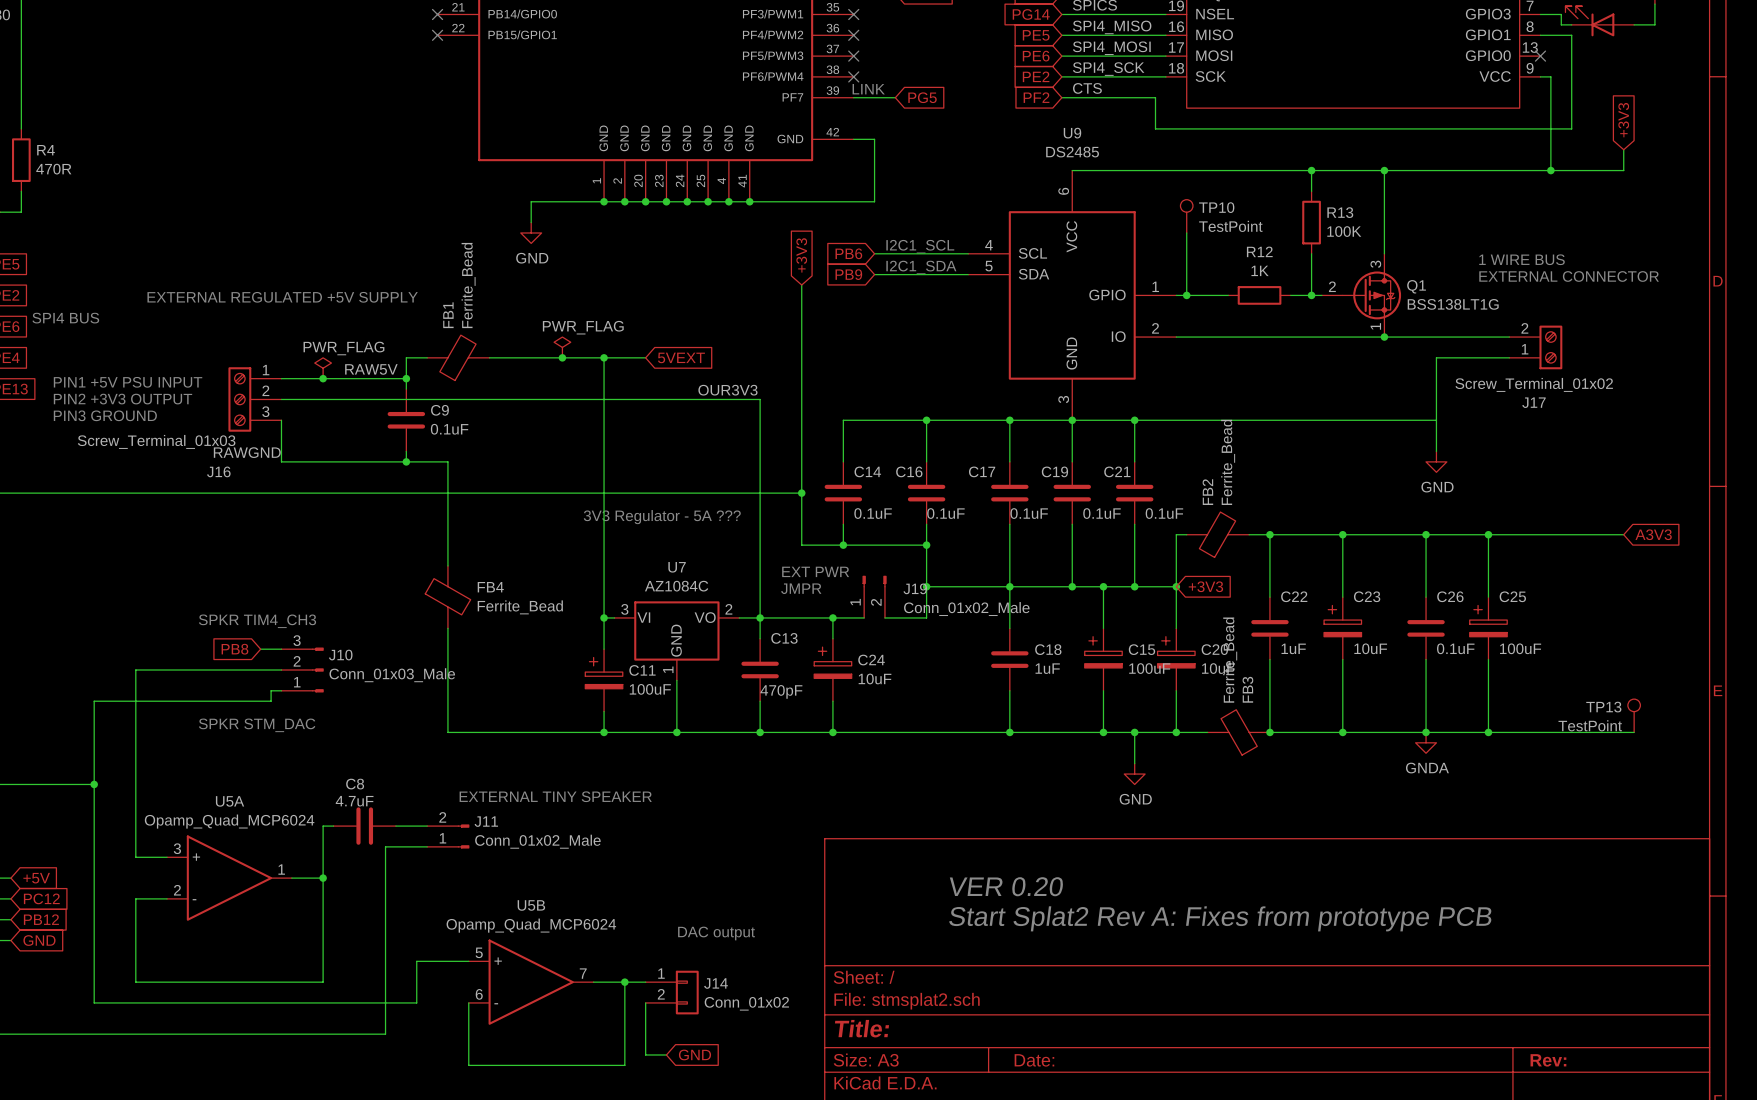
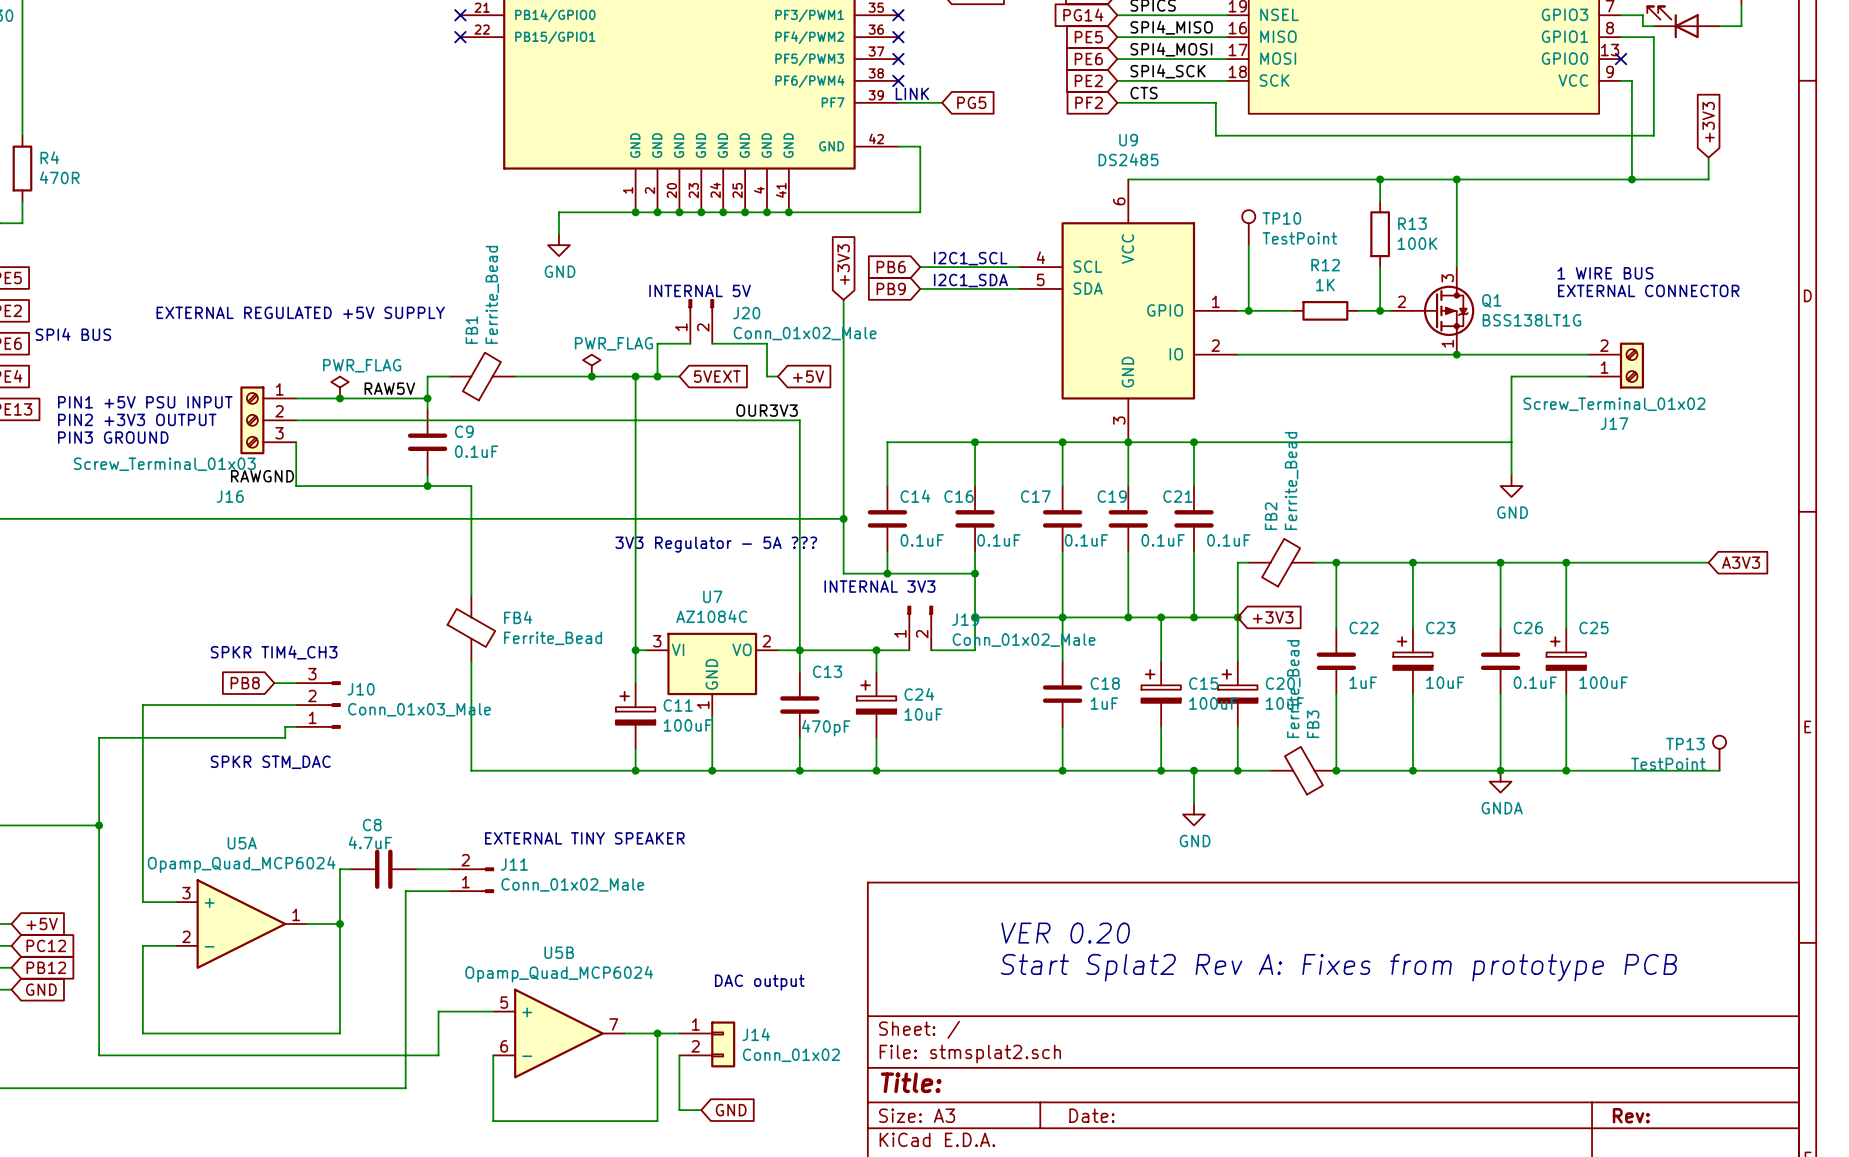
text: none -> INTERNAL 5V (700, 290)
J20: none -> Conn_01x02_Male (701, 321)
wire: none -> (690, 343) (657, 343) (657, 376)
wire: none -> (712, 343) (766, 343) (766, 376) (777, 376)
junction: none -> (657, 376)
global label: none -> +5V (808, 376)
text: none -> INTERNAL 3V3 (879, 586)
text: EXT PWR (815, 571) -> none
text: JMPR (801, 588) -> none

